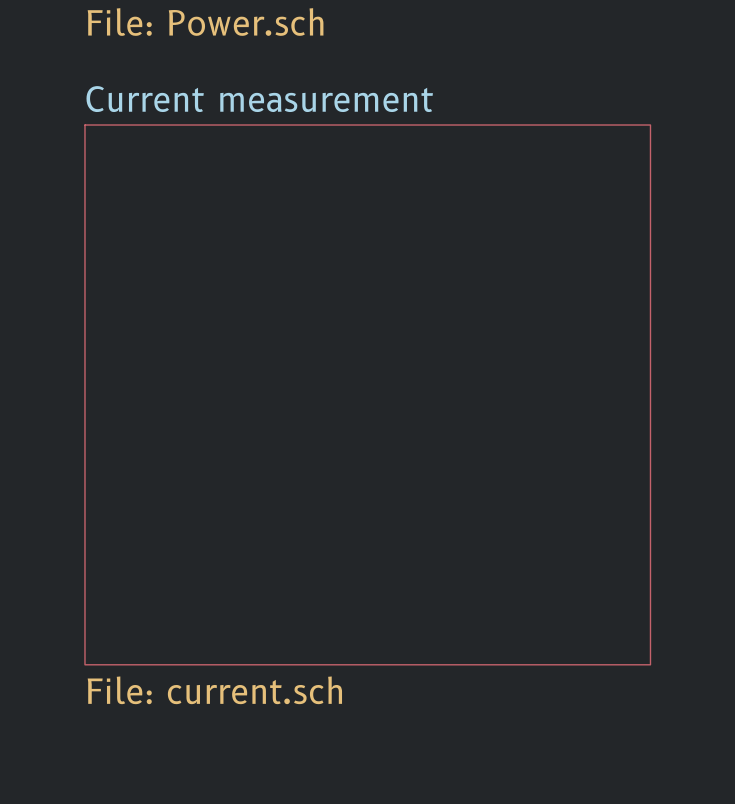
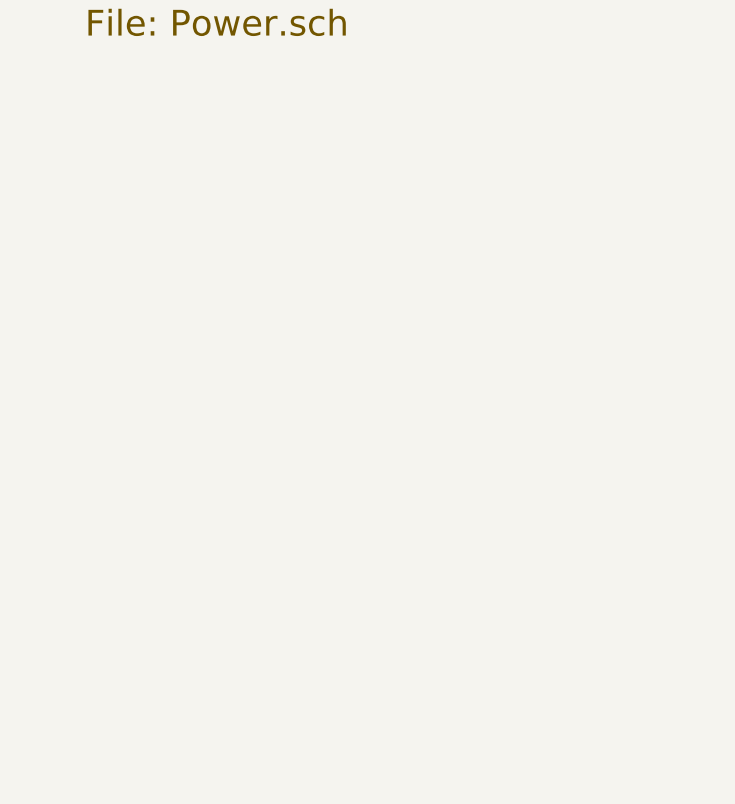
sheet Current measurement: File: current.sch (367, 394) -> none

